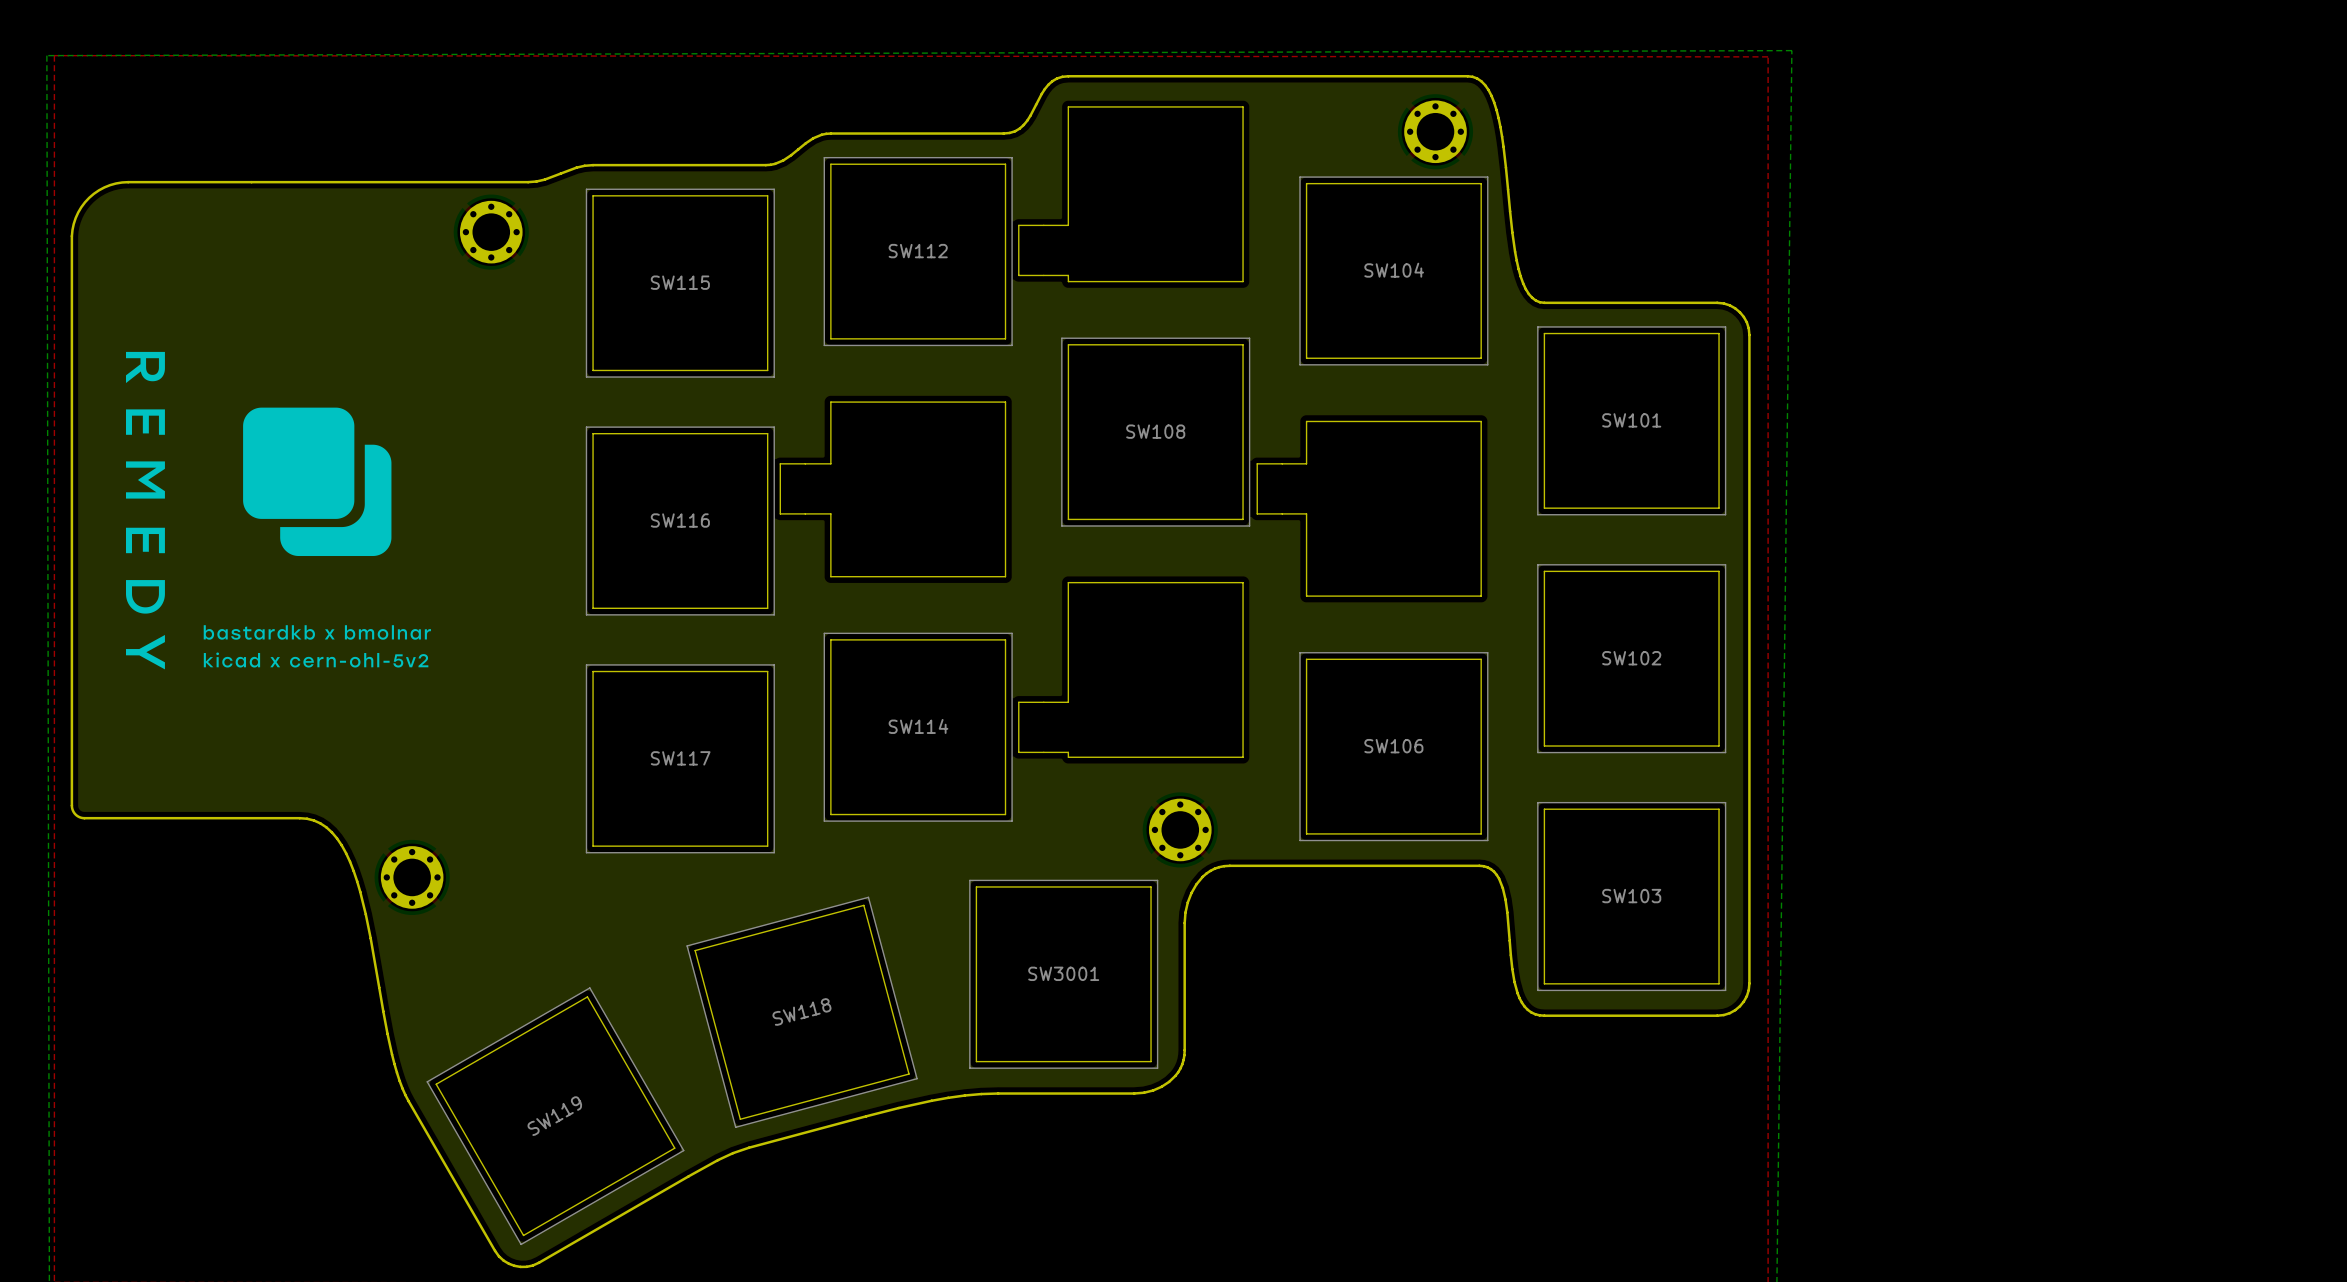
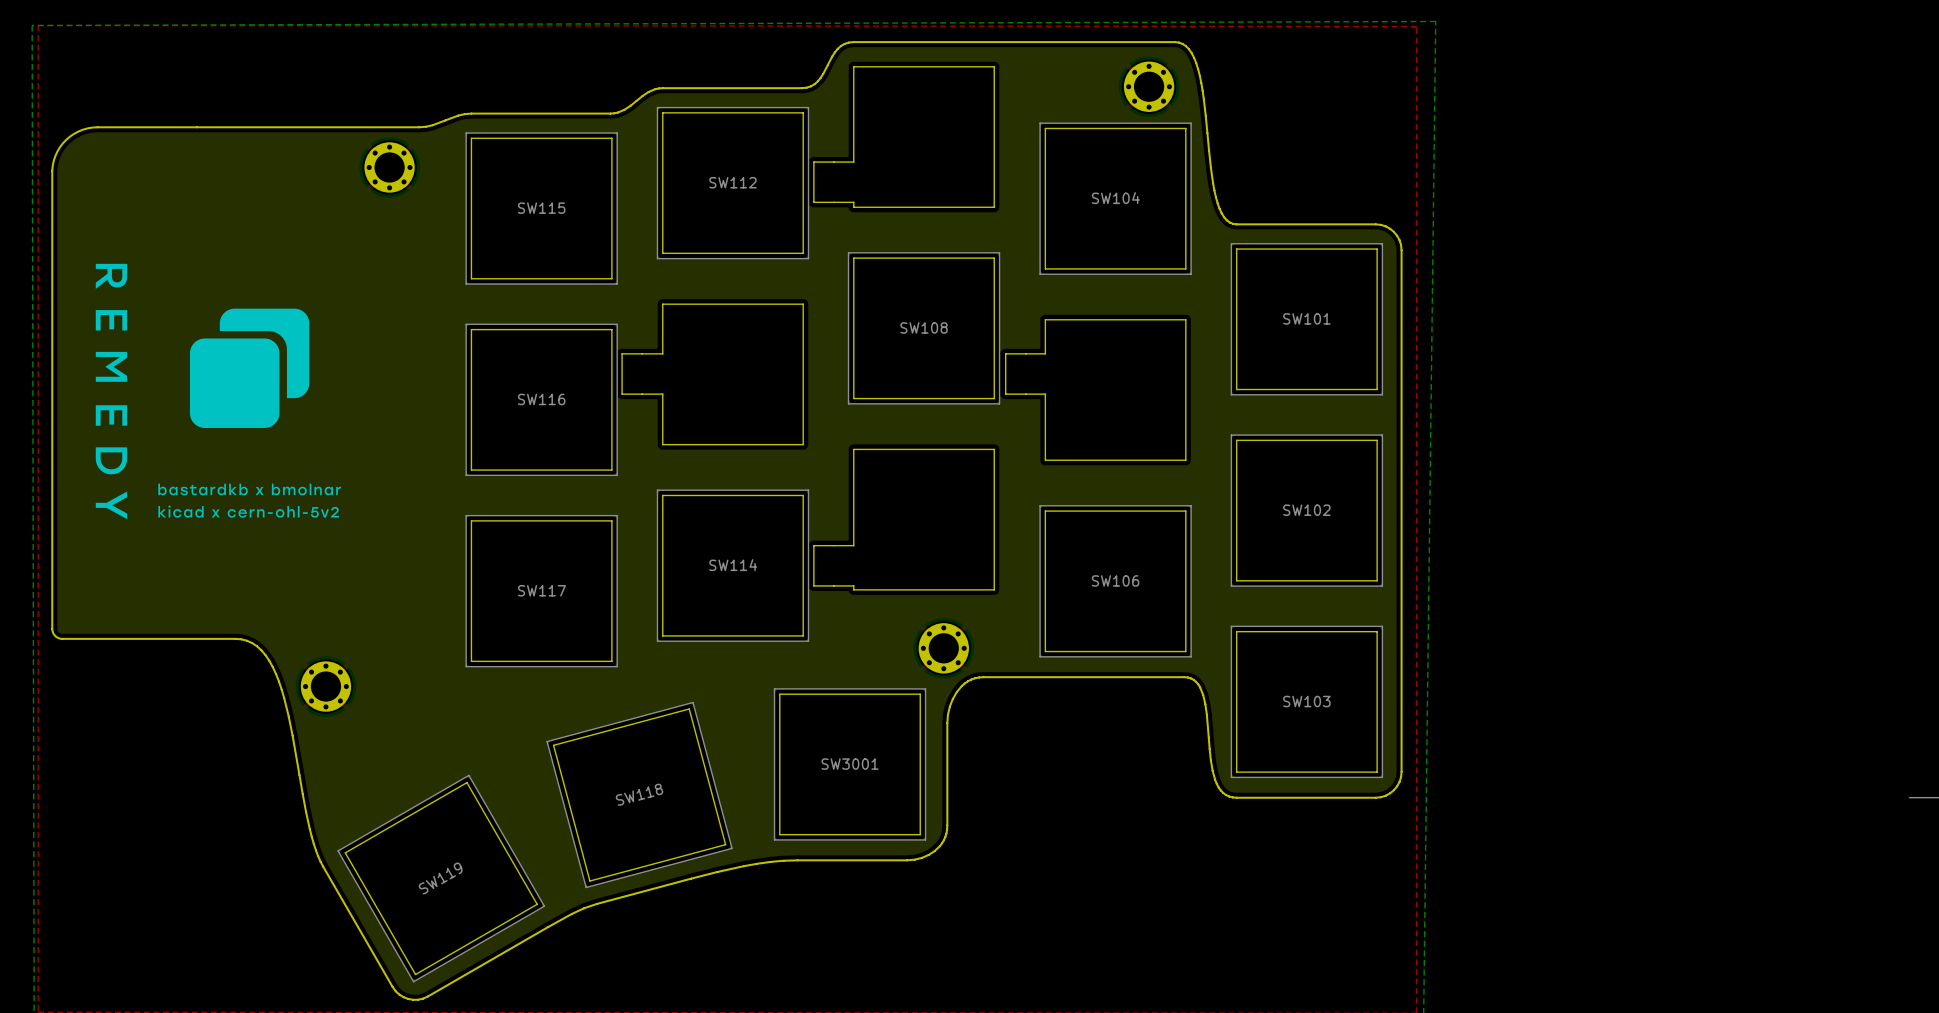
drawing shape: [125, 351, 431, 670] -> [95, 263, 342, 520]

